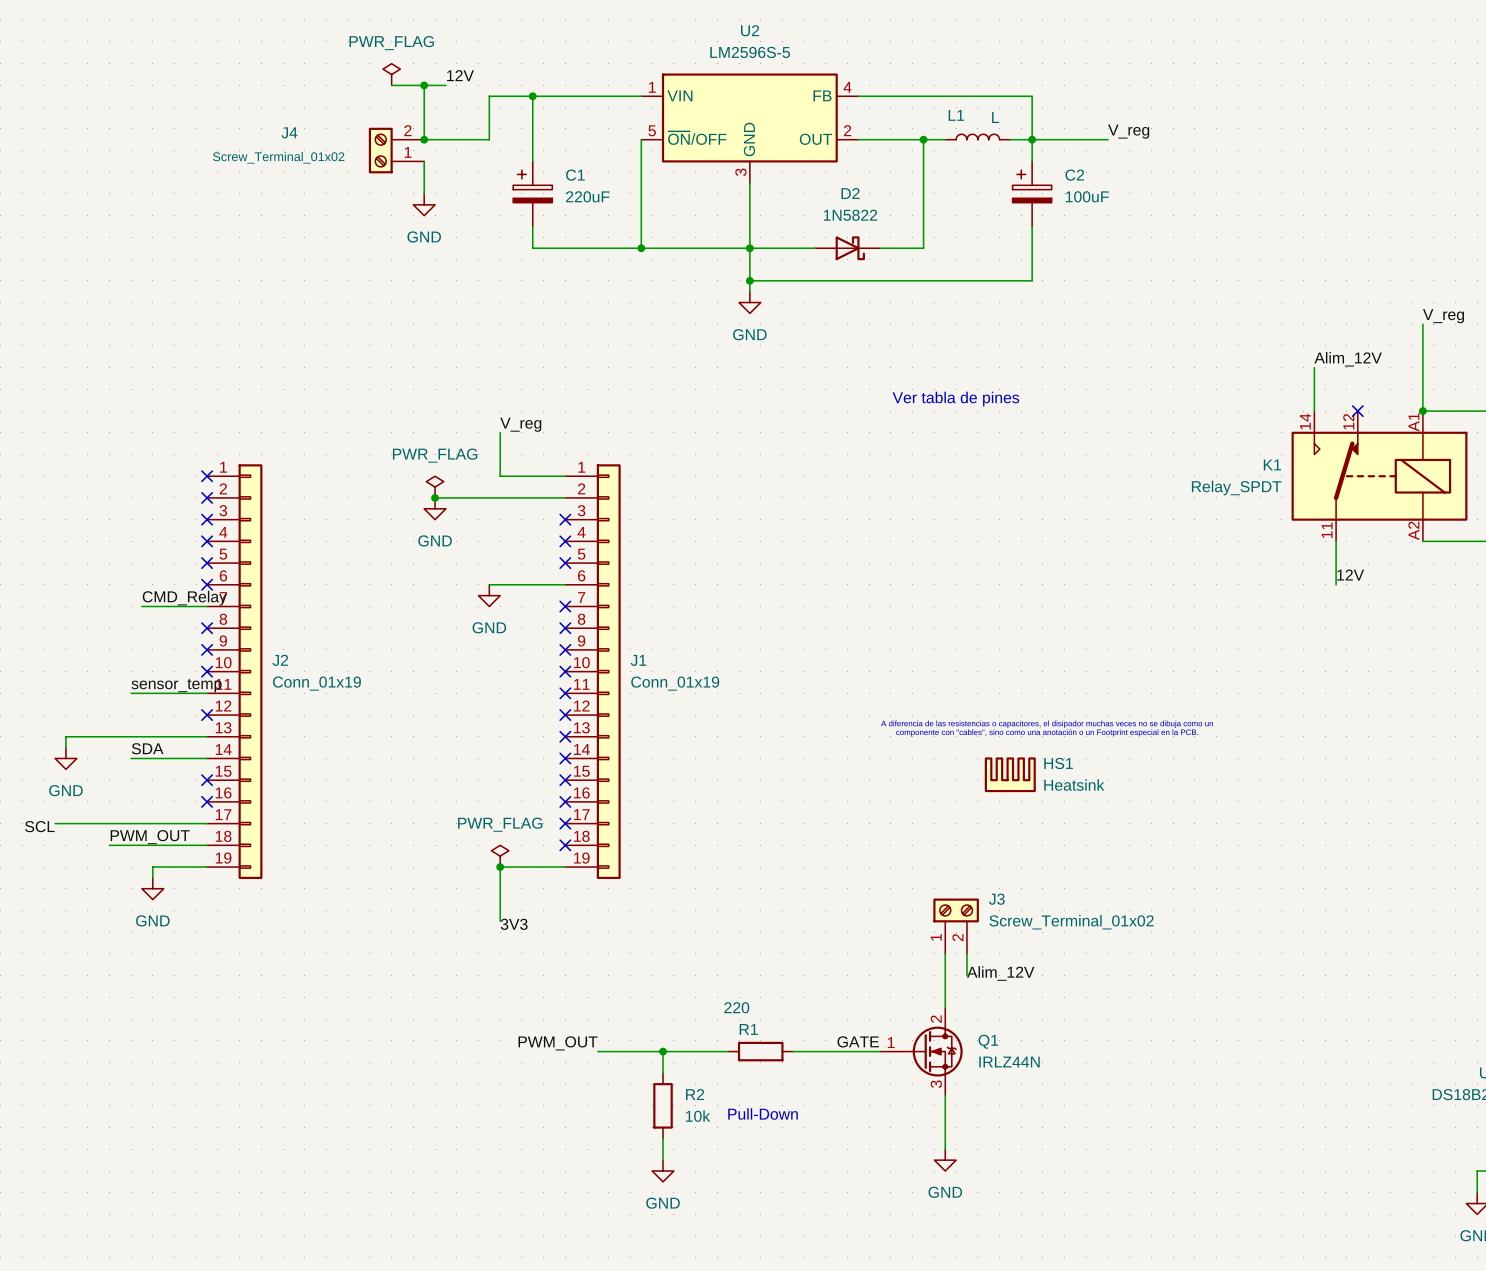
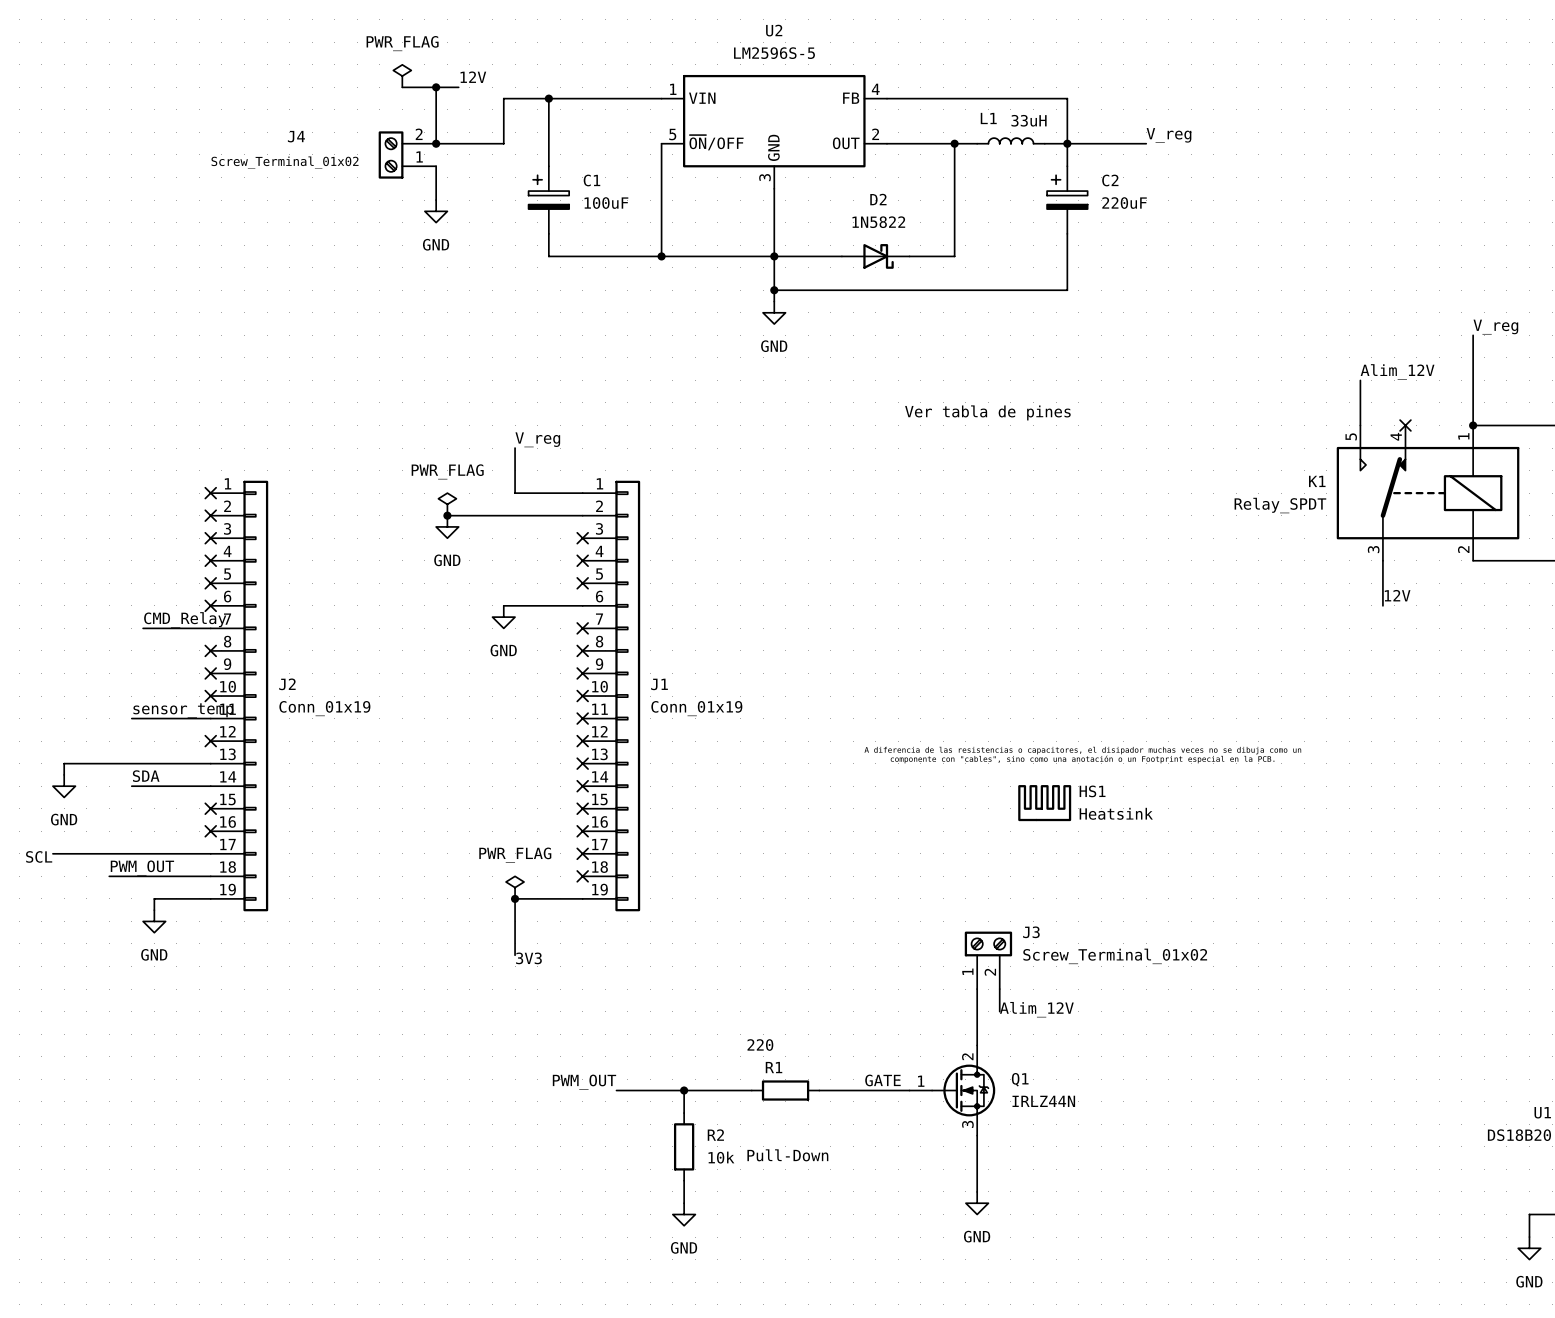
L1 value: L (995, 117) -> 33uH (1029, 120)
C1 value: 220uF (587, 196) -> 100uF (606, 203)
C2 value: 100uF (1087, 196) -> 220uF (1124, 203)
K1 pin number: 14 (1305, 421) -> 5 (1351, 436)
K1 pin number: 12 (1348, 421) -> 4 (1396, 436)
K1 pin number: A1 (1413, 422) -> 1 (1463, 436)
K1 pin number: 11 (1327, 530) -> 3 (1373, 549)
K1 pin number: A2 (1413, 530) -> 2 (1463, 549)

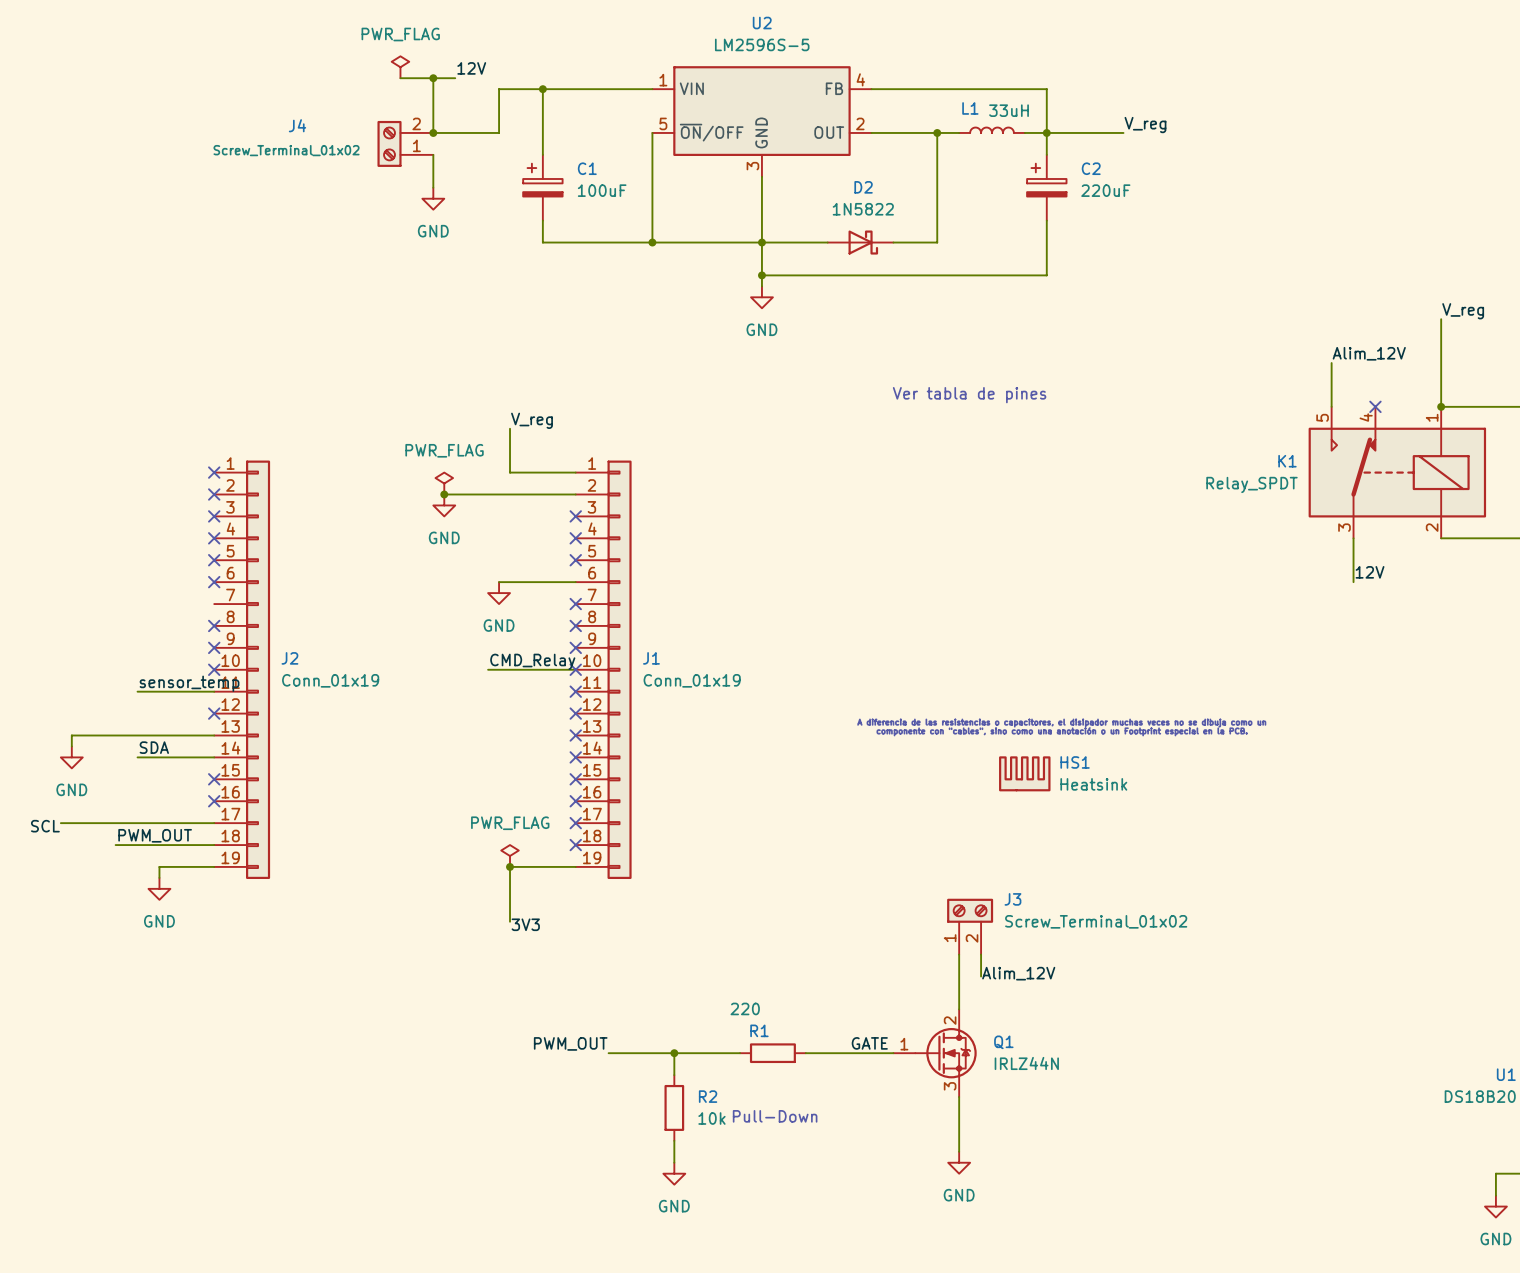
label: CMD_Relay (185, 619) -> none
wire: (143, 628) (210, 628) -> none
label: none -> CMD_Relay (532, 661)
wire: none -> (488, 669) (575, 669)

